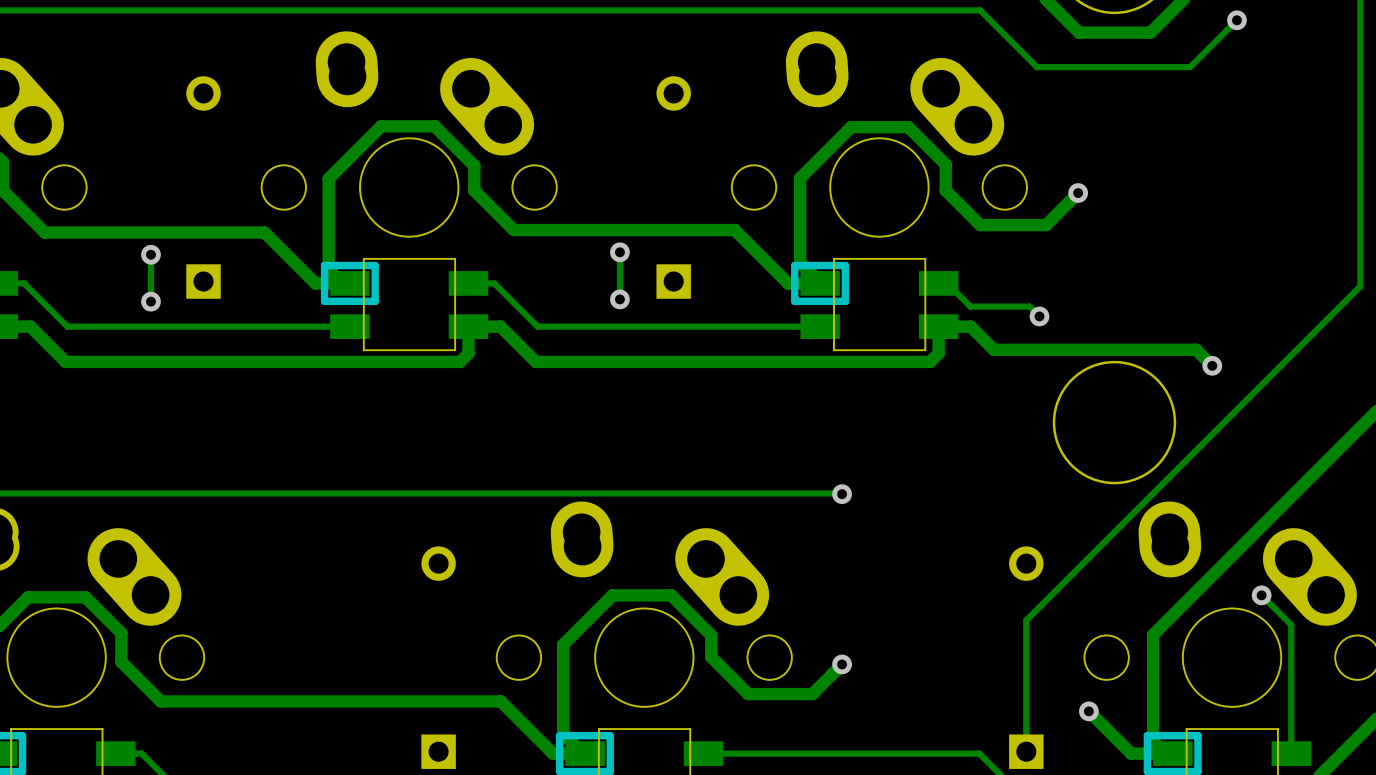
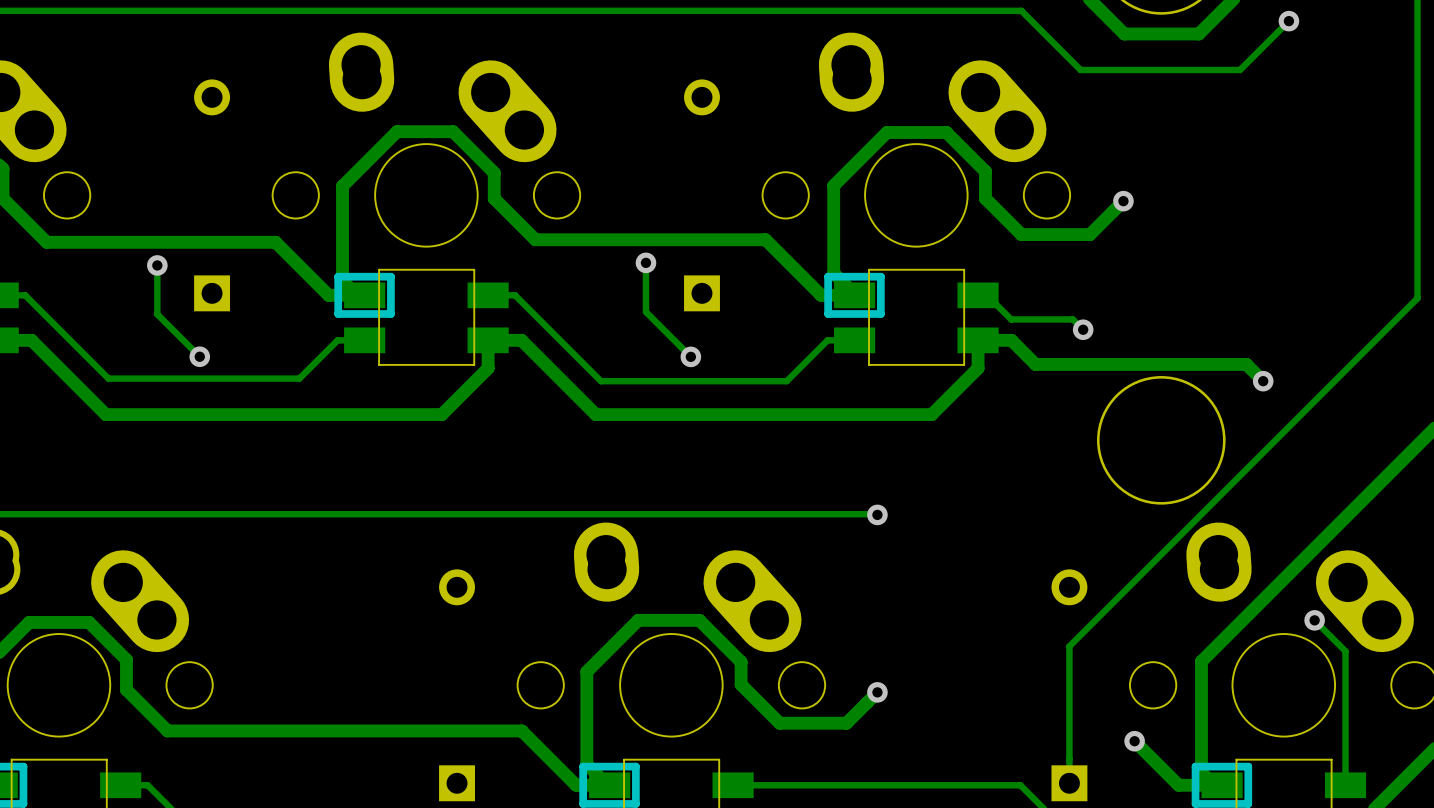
track: none -> (645, 312) (690, 356)
via position: (619, 299) -> (690, 356)
track: none -> (157, 314) (199, 356)
via position: (150, 301) -> (199, 356)
track: (324, 326) (67, 326) -> (337, 340) (299, 378) (108, 378) (70, 340)
track: (794, 326) (537, 326) -> (827, 340) (786, 381) (600, 381) (560, 340)
track: (459, 361) (65, 361) -> (479, 377) (441, 414) (105, 414) (68, 377)
track: (930, 361) (535, 361) -> (969, 377) (931, 414) (595, 414) (558, 377)

